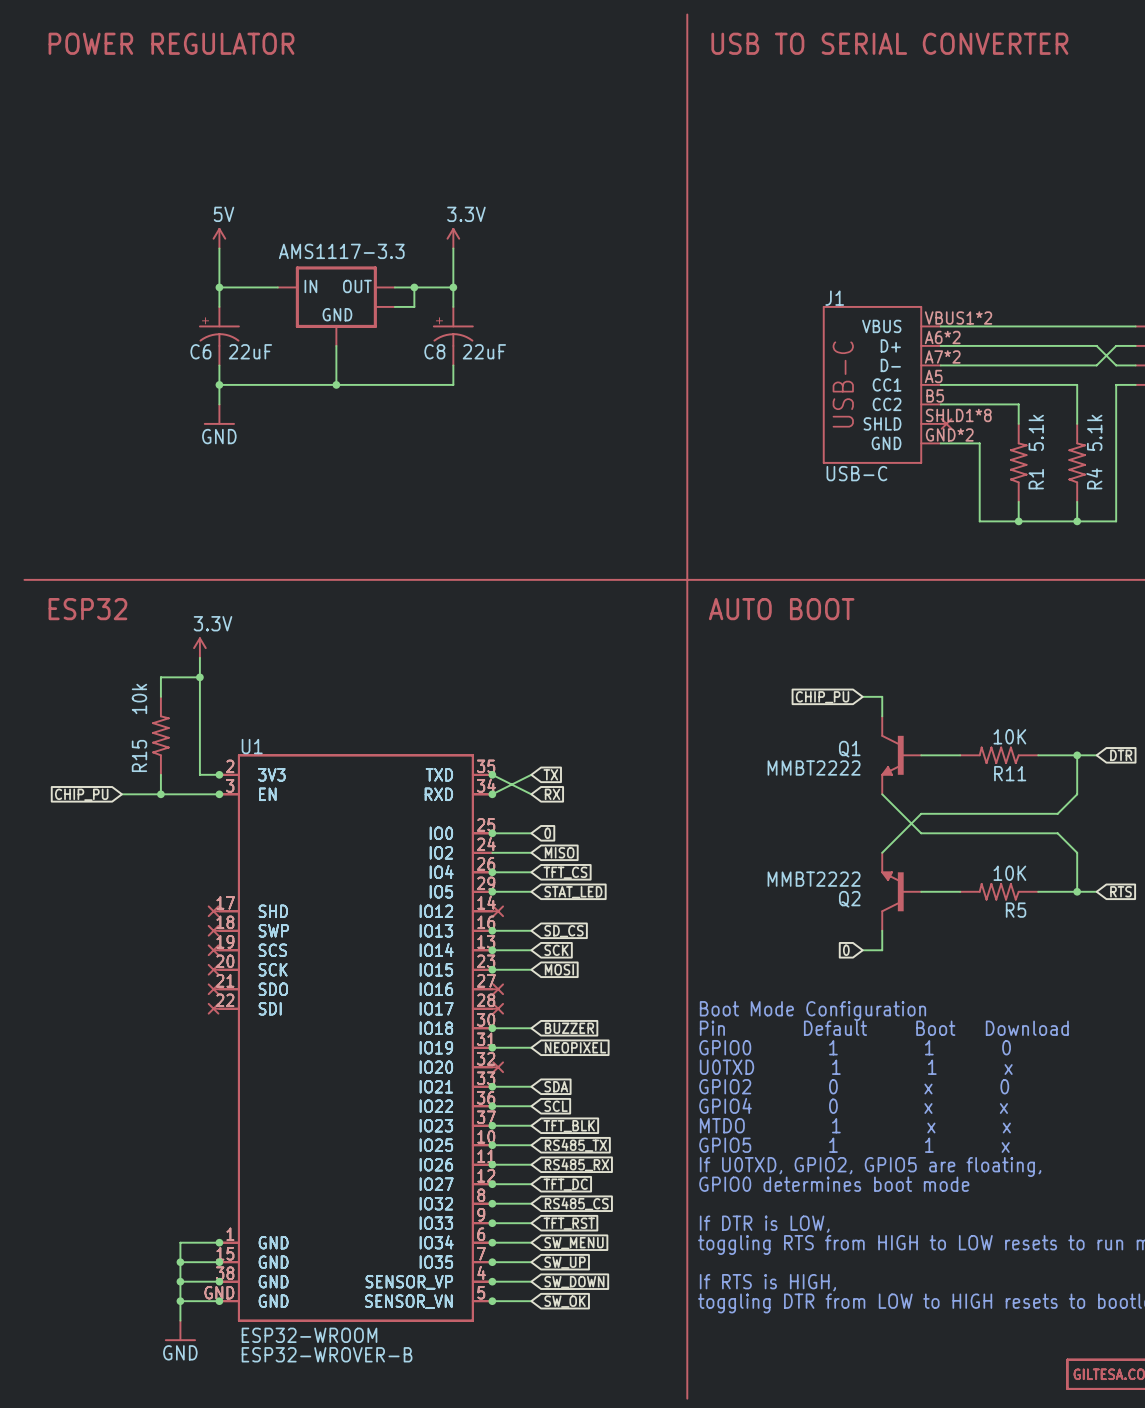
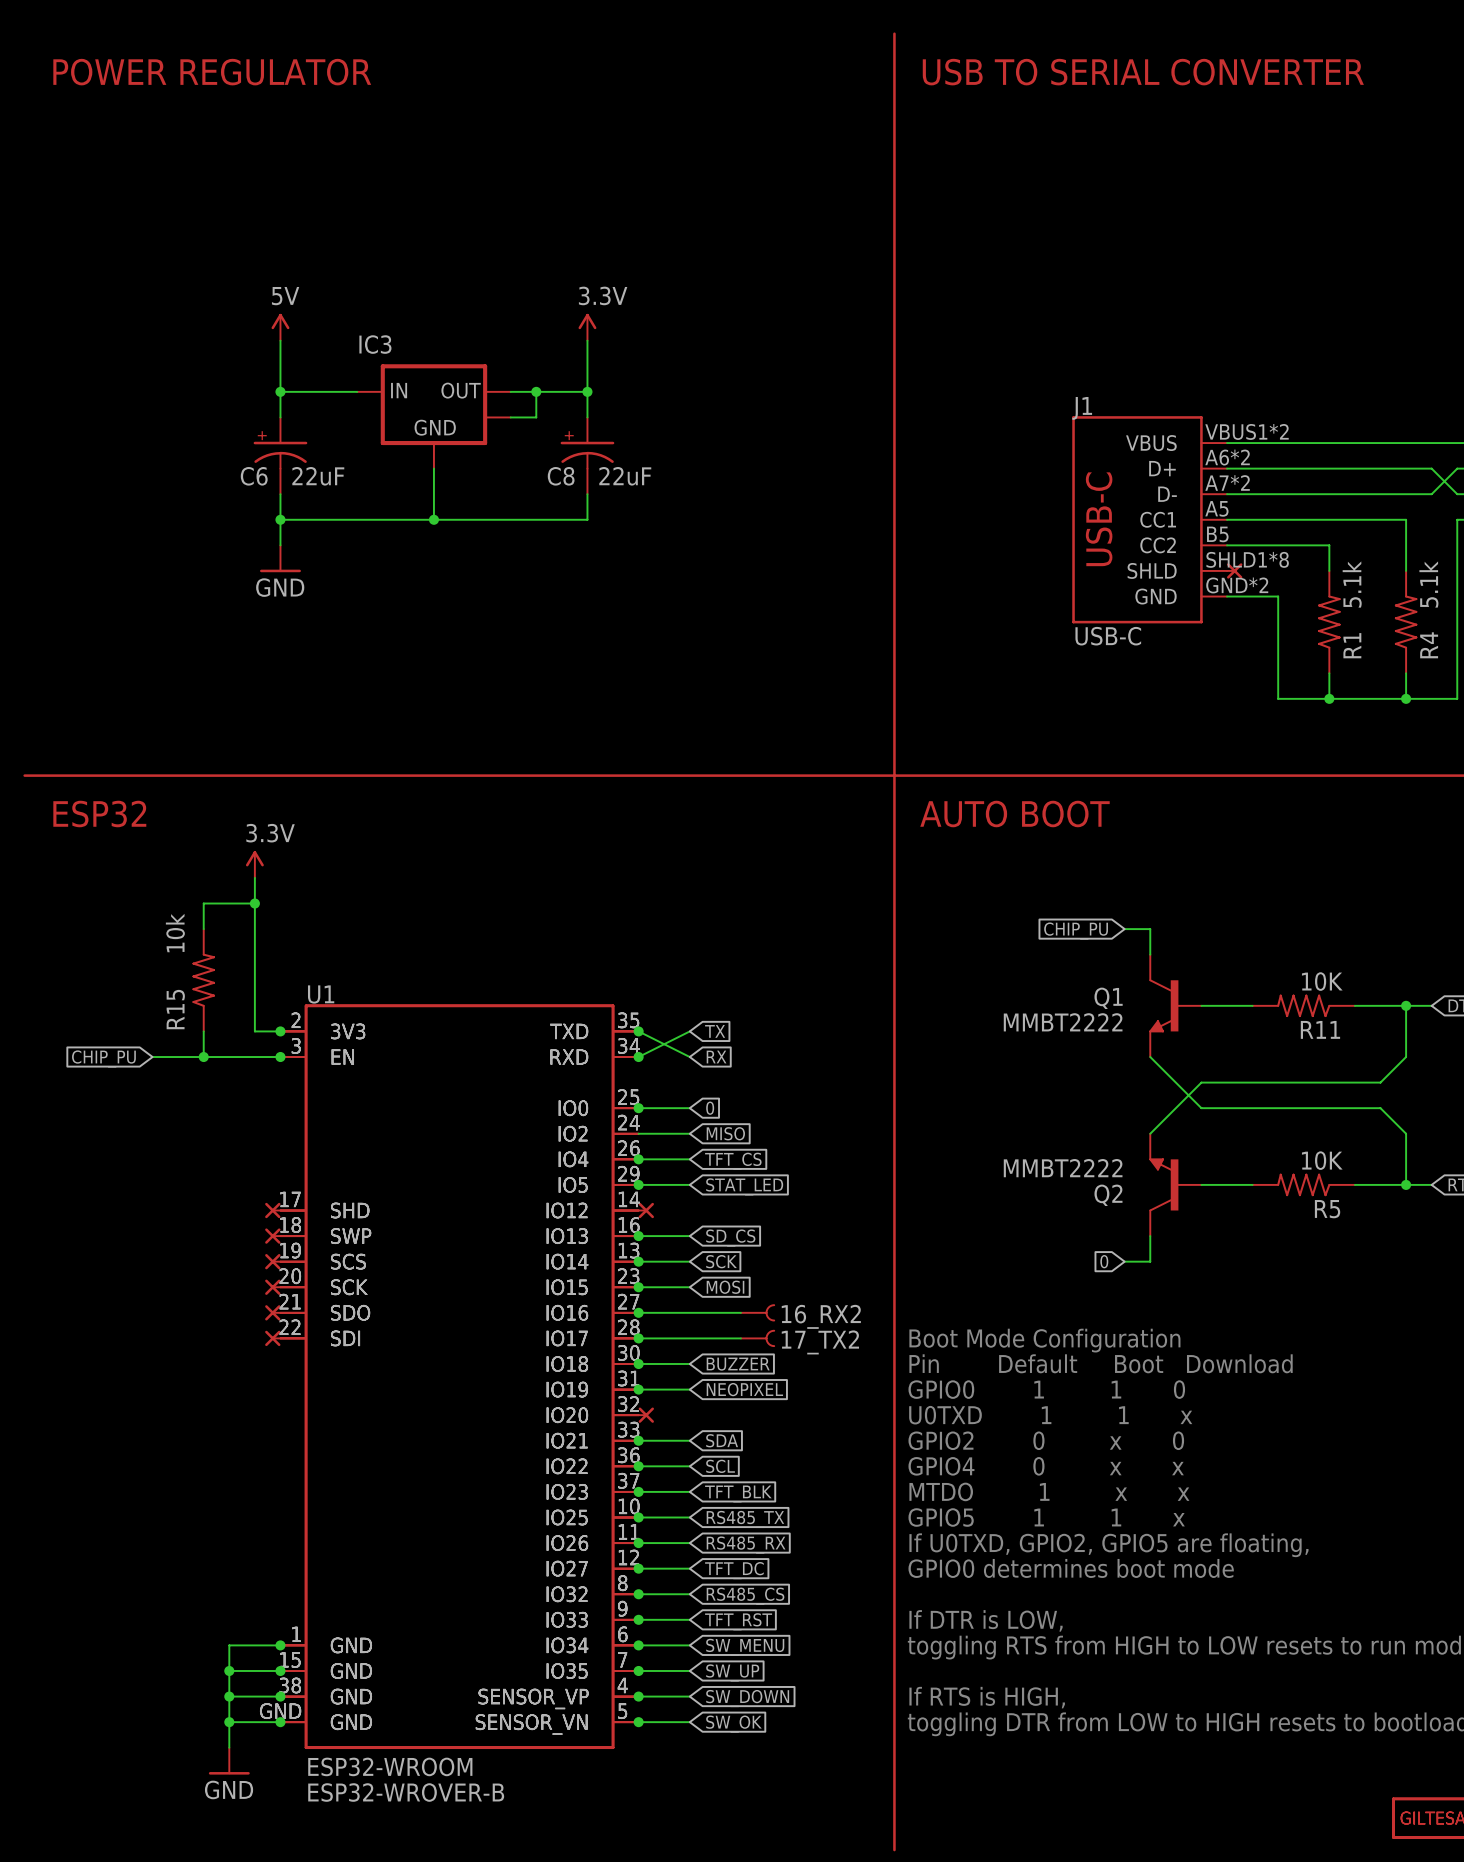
AMS1117-3.3 name: AMS1117-3.3 (341, 251) -> IC3 (375, 344)
wire: none -> (638, 1312) (740, 1312)
junction: none -> (638, 1312)
part: (497, 989) -> none
16_RX2: none -> (757, 1312)
wire: none -> (638, 1338) (740, 1338)
junction: none -> (638, 1338)
part: (497, 1008) -> none
17_TX2: none -> (757, 1338)

